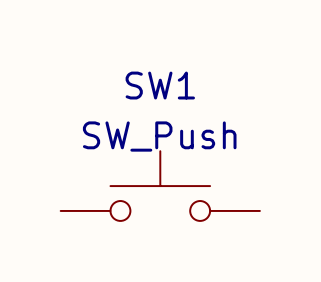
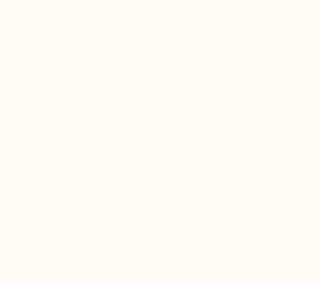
SW1: SW_Push (160, 186) -> none

